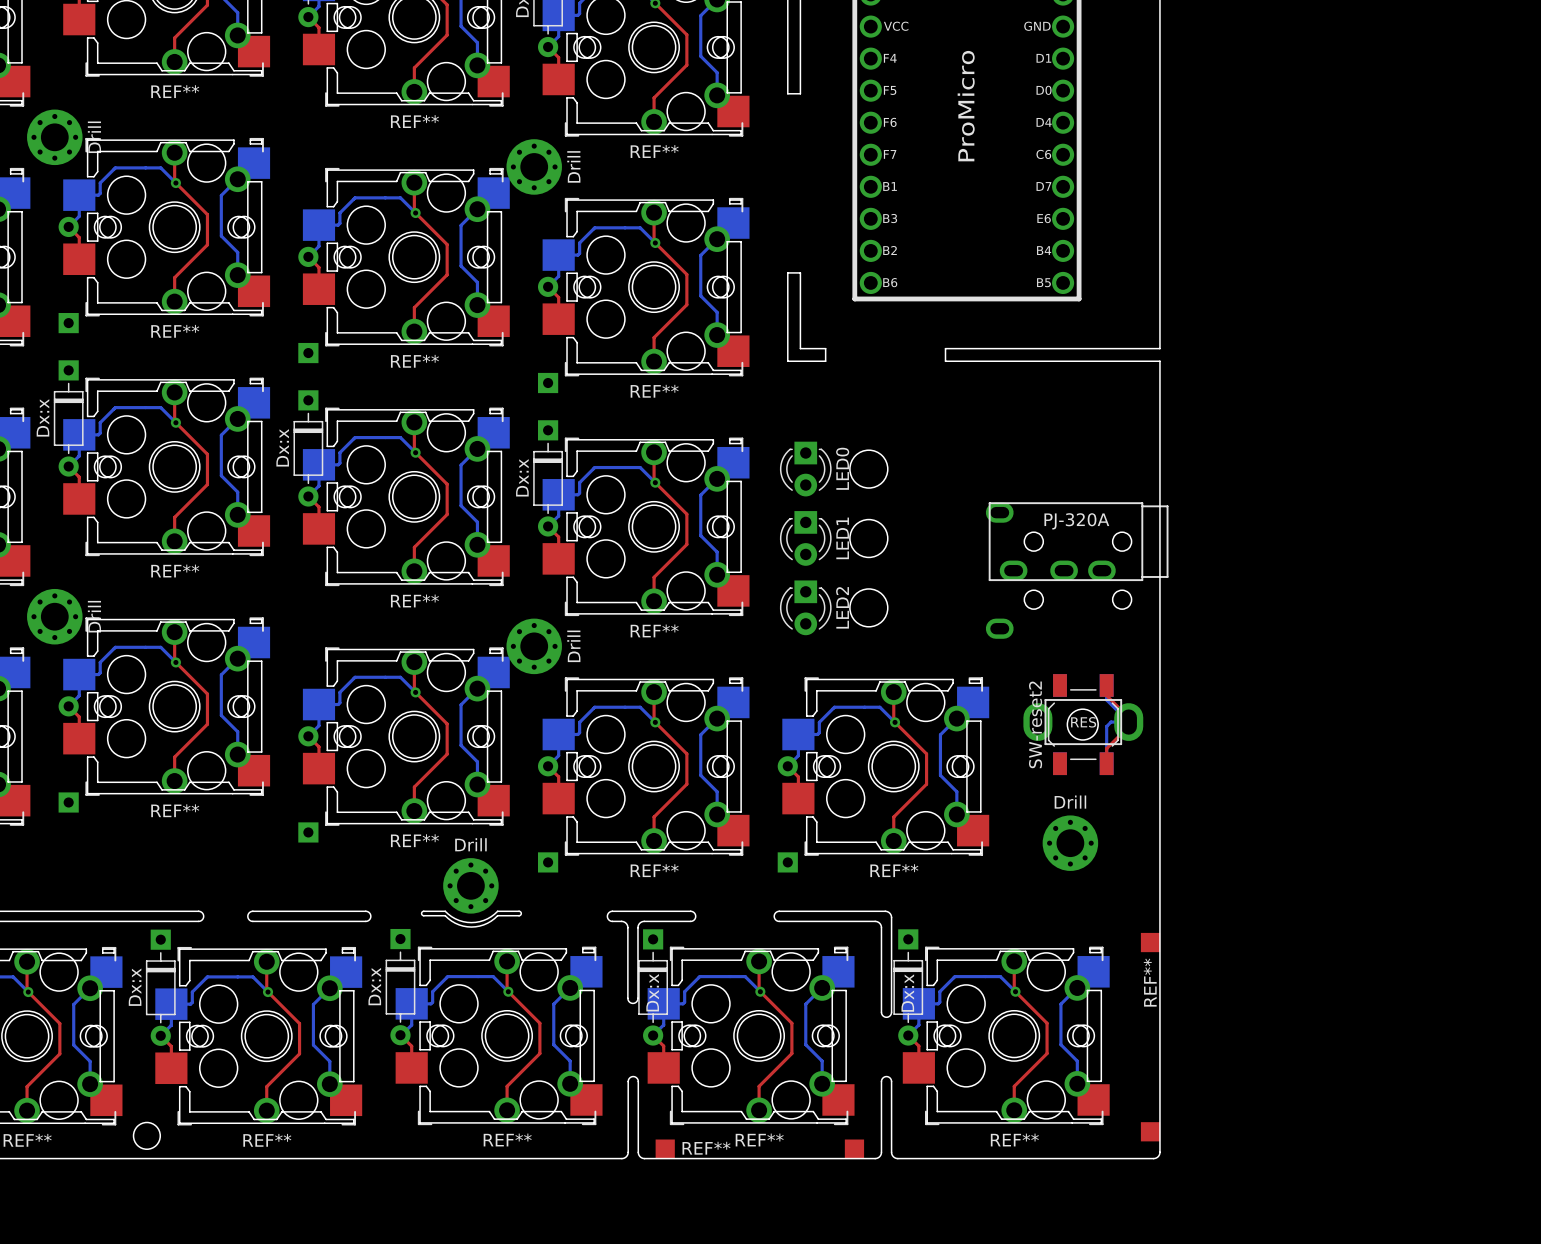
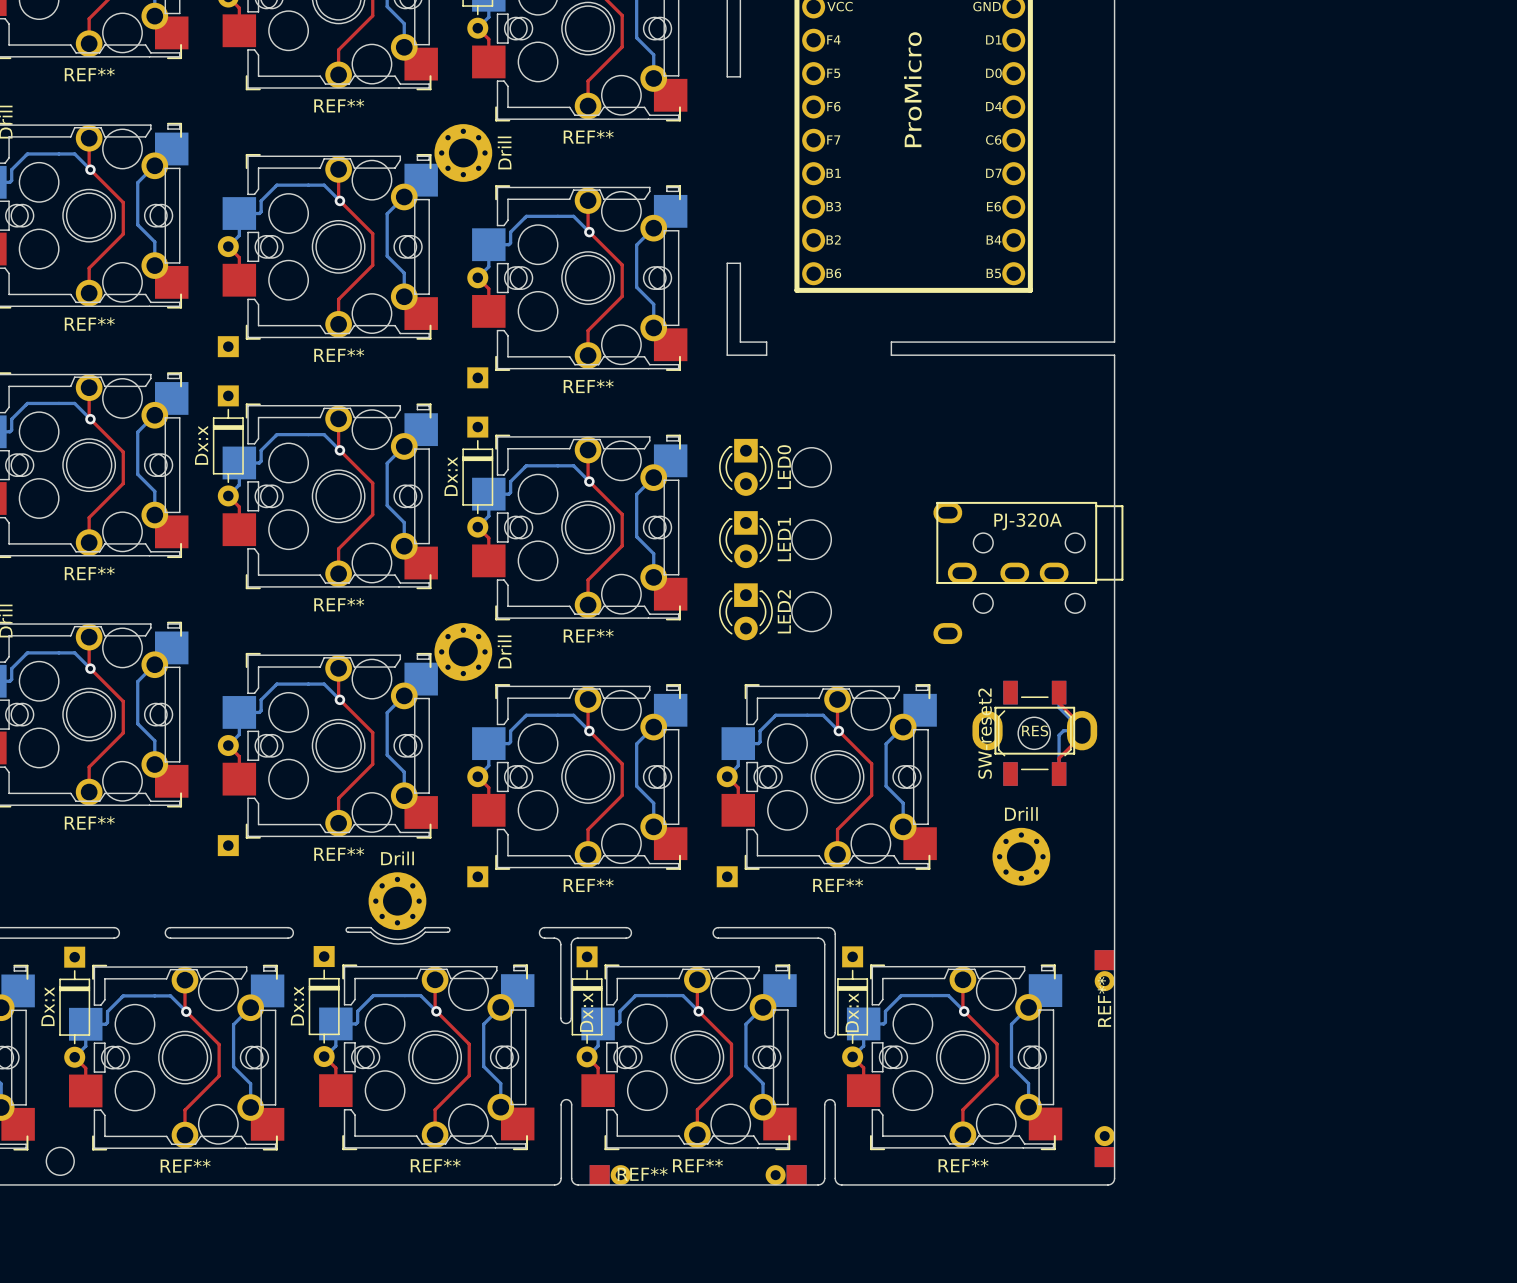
REF** footprint: [1140, 932, 1161, 1142] -> [1094, 950, 1115, 1168]
REF** footprint: [655, 1139, 865, 1159] -> [589, 1165, 807, 1186]

